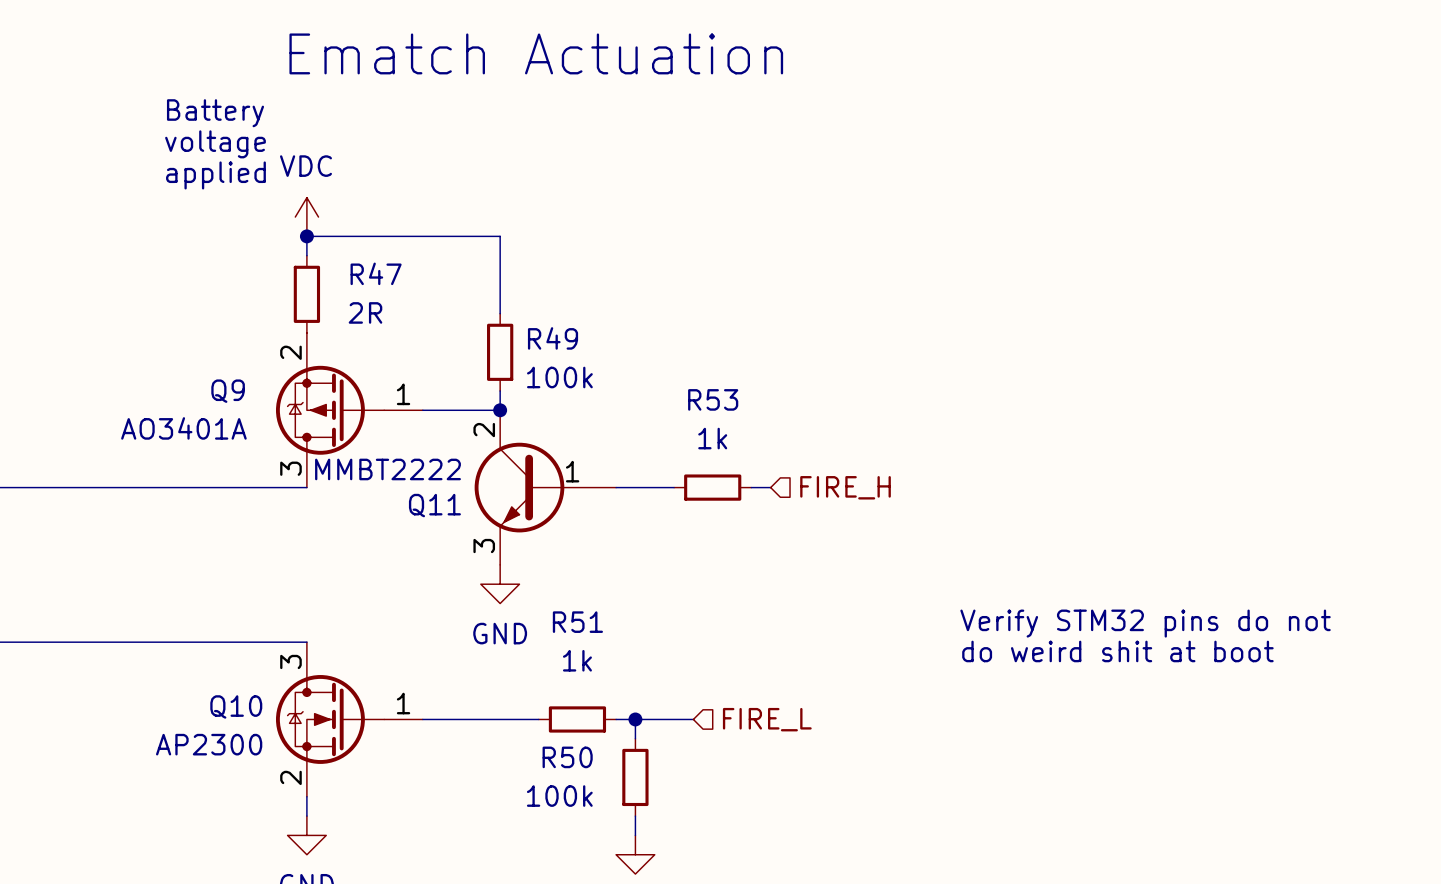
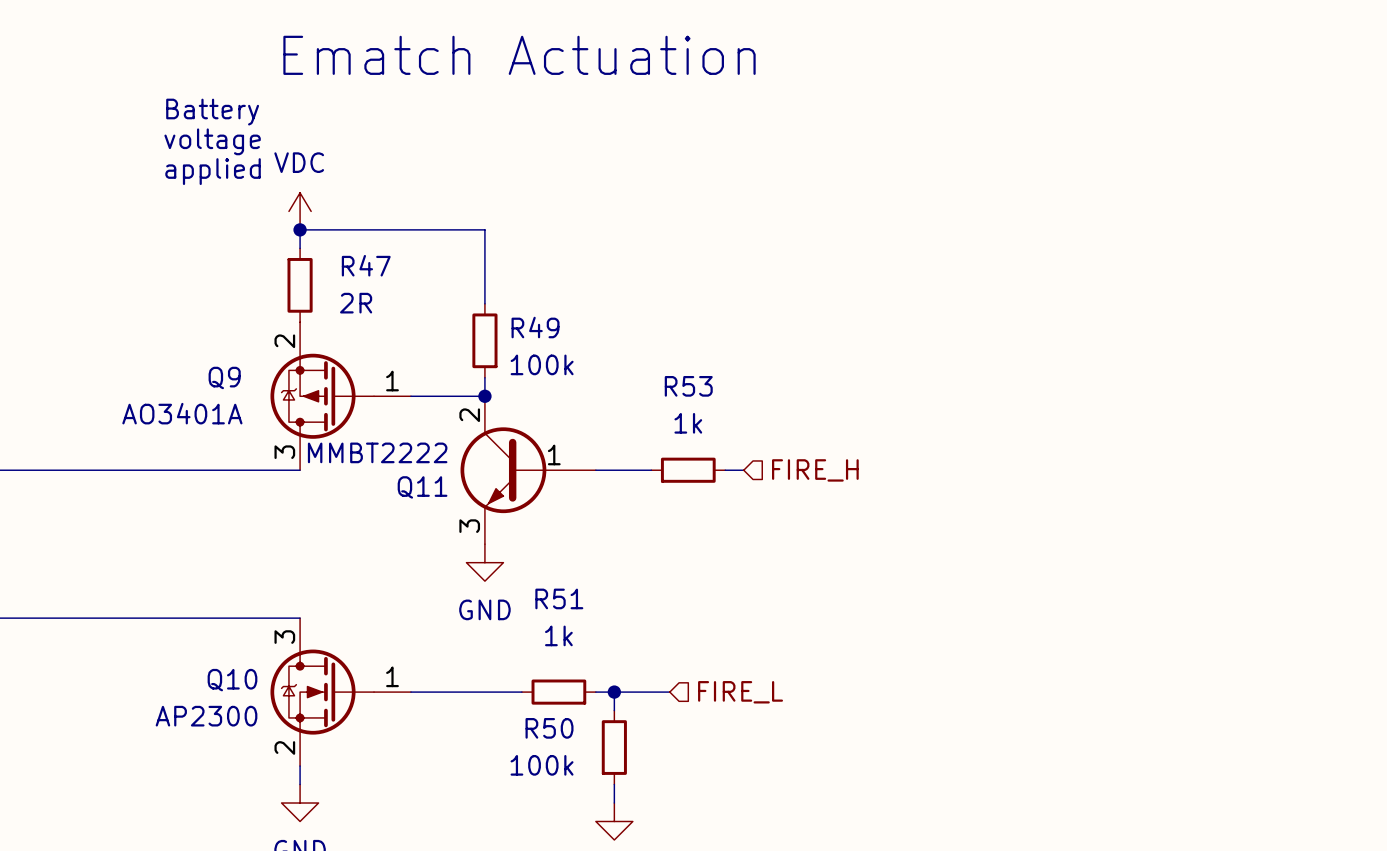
text: Verify STM32 pins do not (1145, 623) -> none
text: do weird shit at boot (1117, 651) -> none

